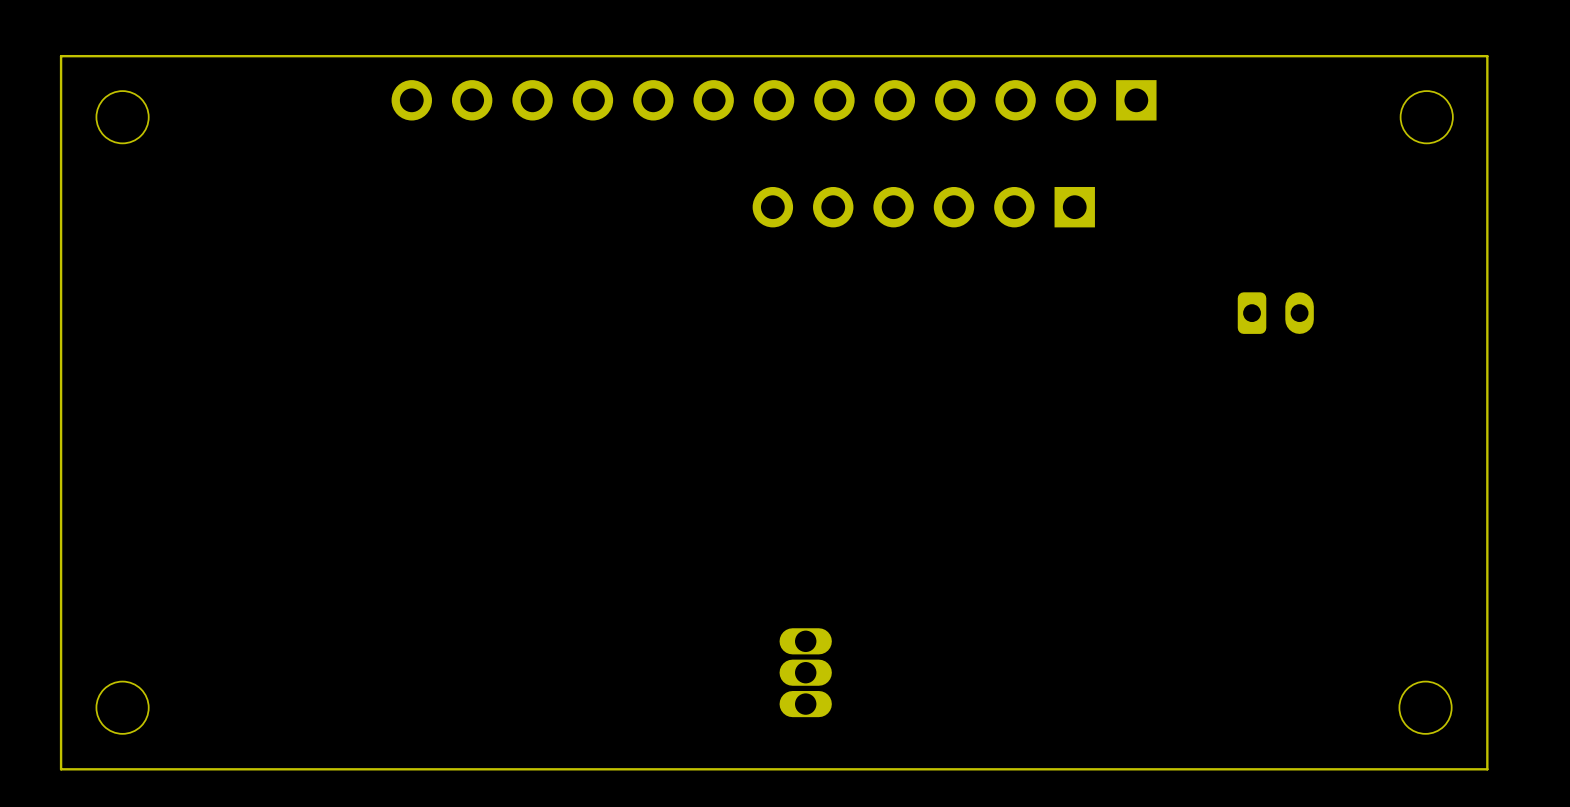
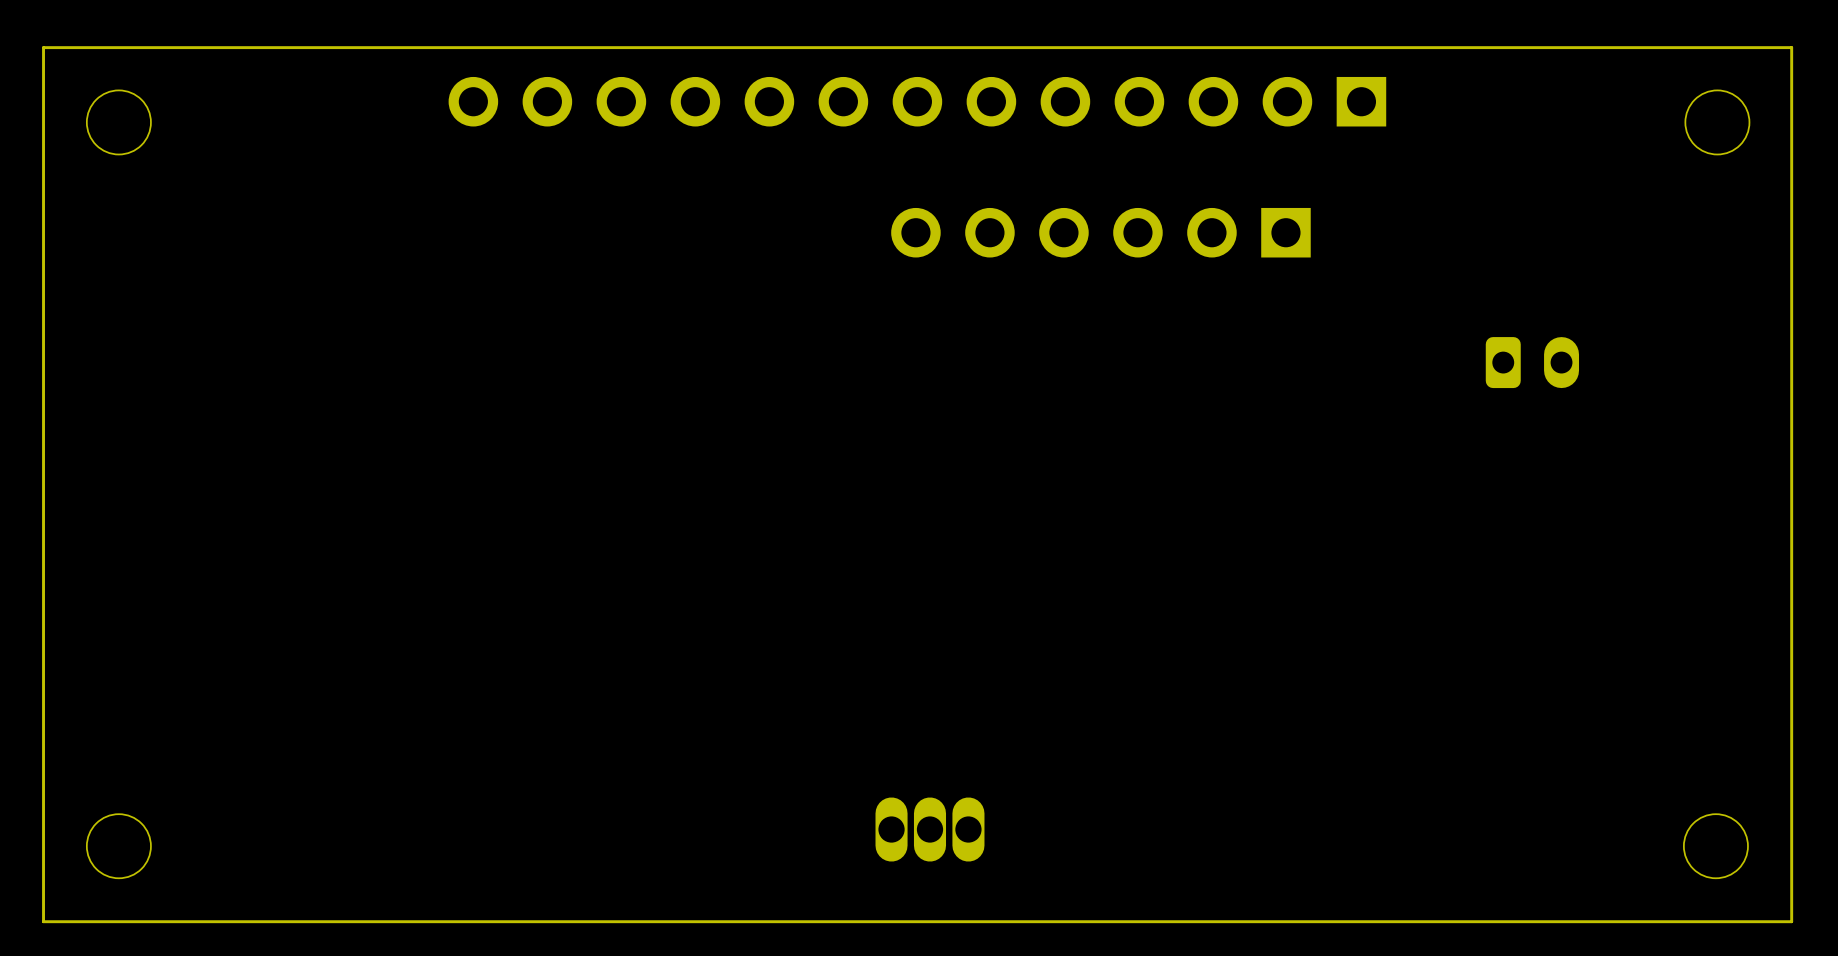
part rotation: 0° (805, 672) -> 90° clockwise (929, 829)

